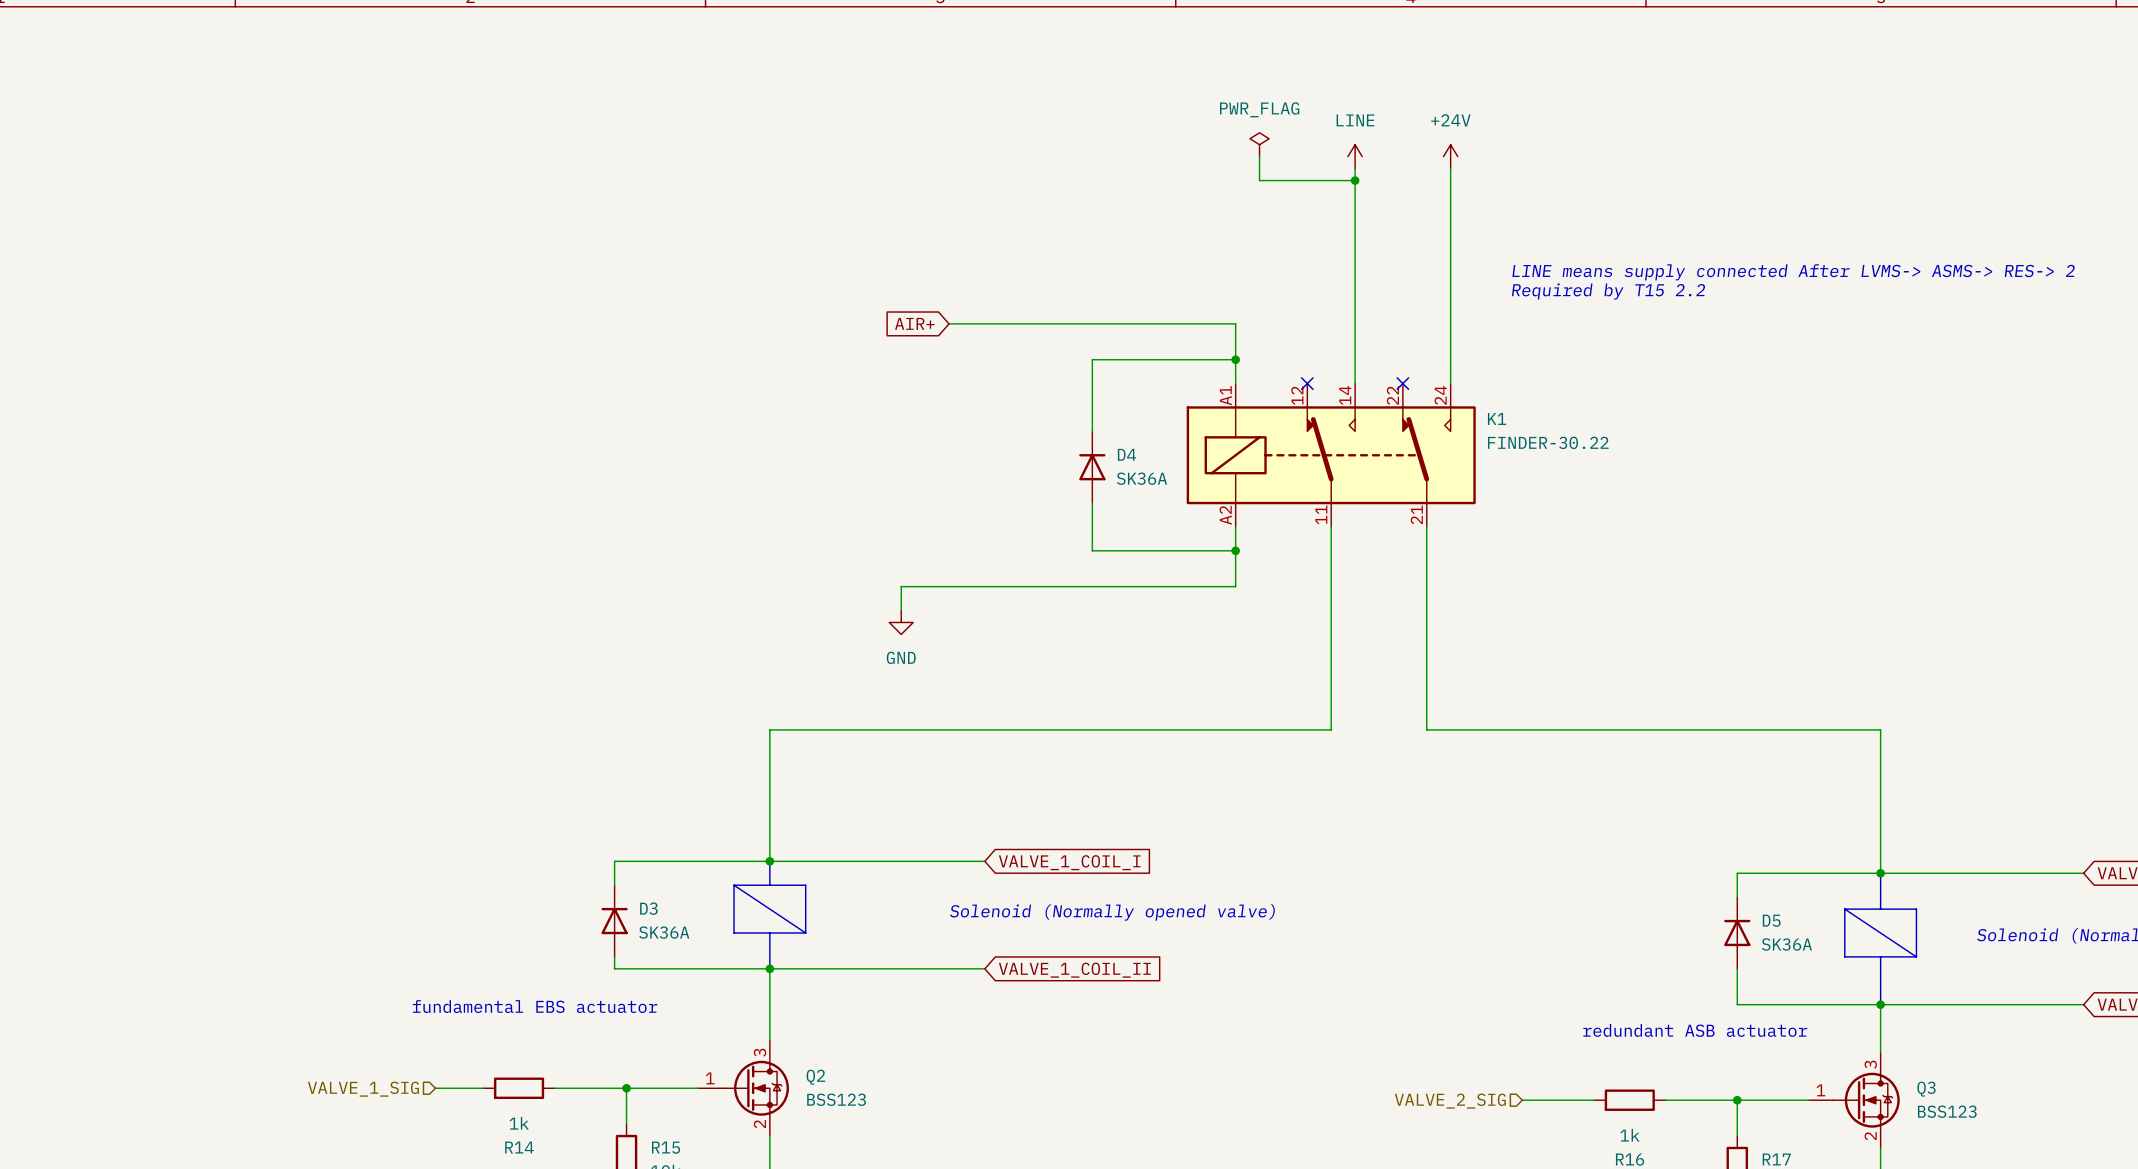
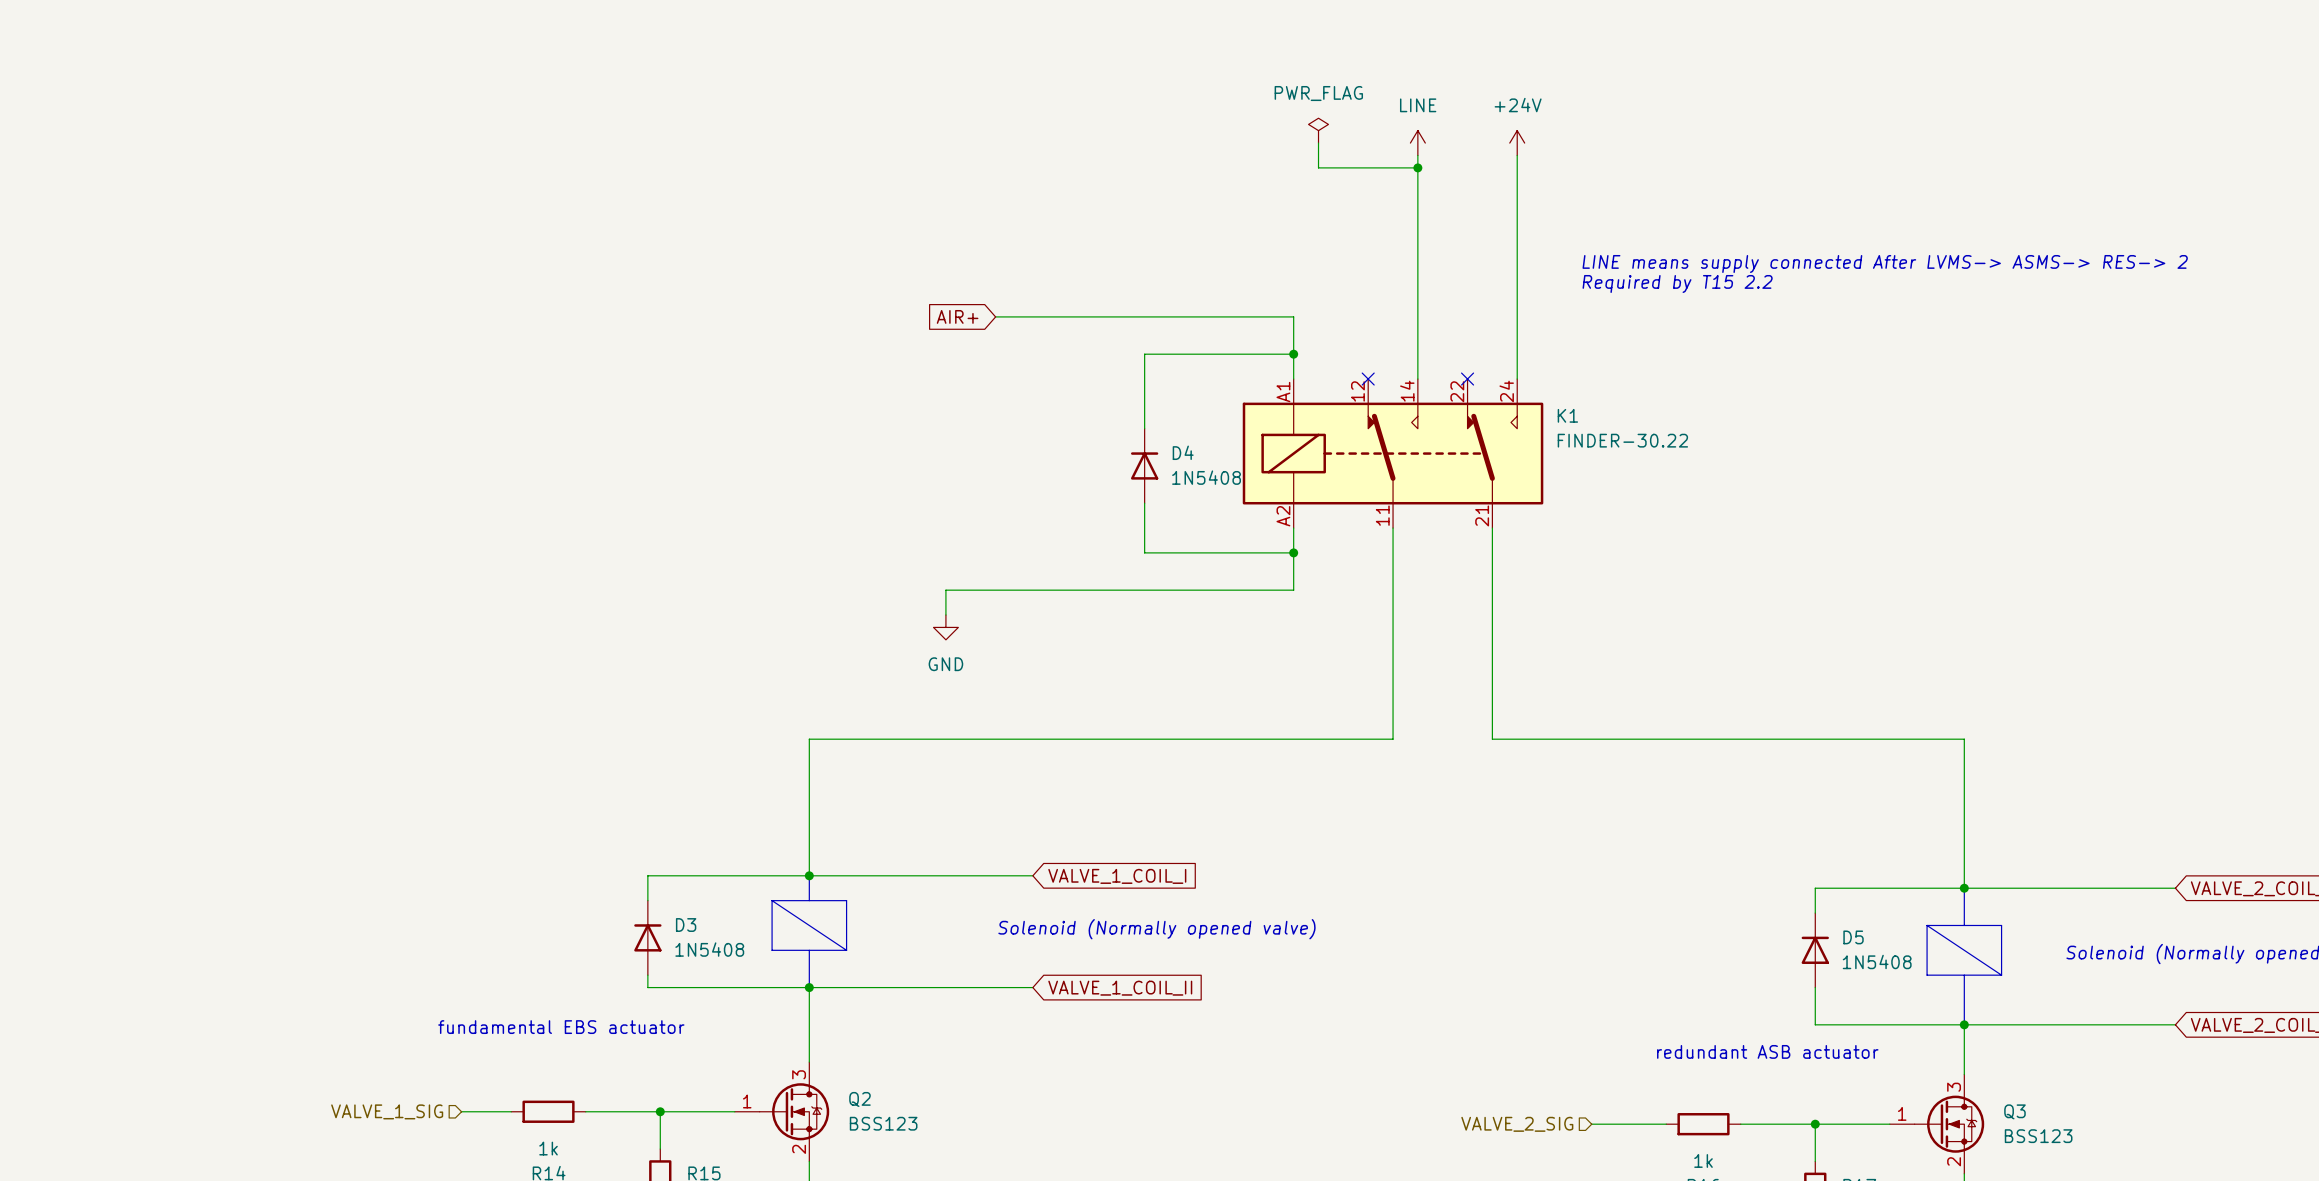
D4 value: SK36A (1142, 478) -> 1N5408 (1206, 477)
D3 value: SK36A (664, 932) -> 1N5408 (709, 949)
D5 value: SK36A (1786, 944) -> 1N5408 (1877, 961)

